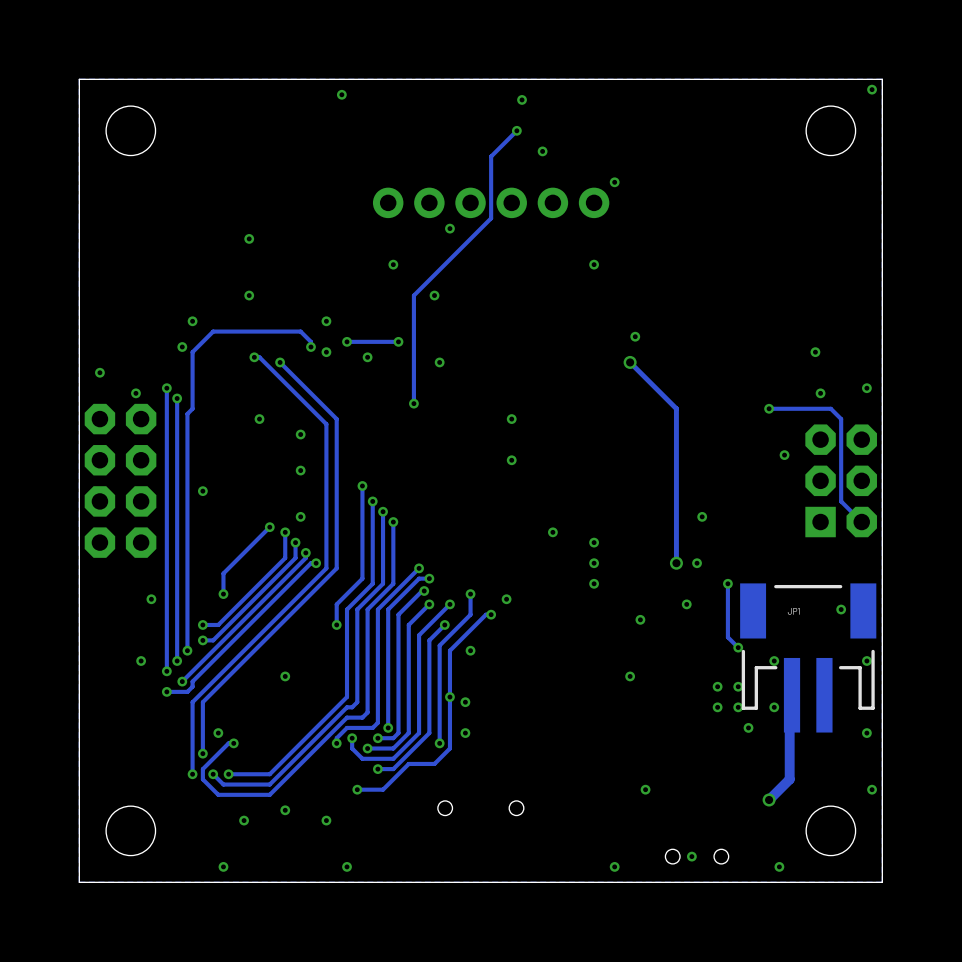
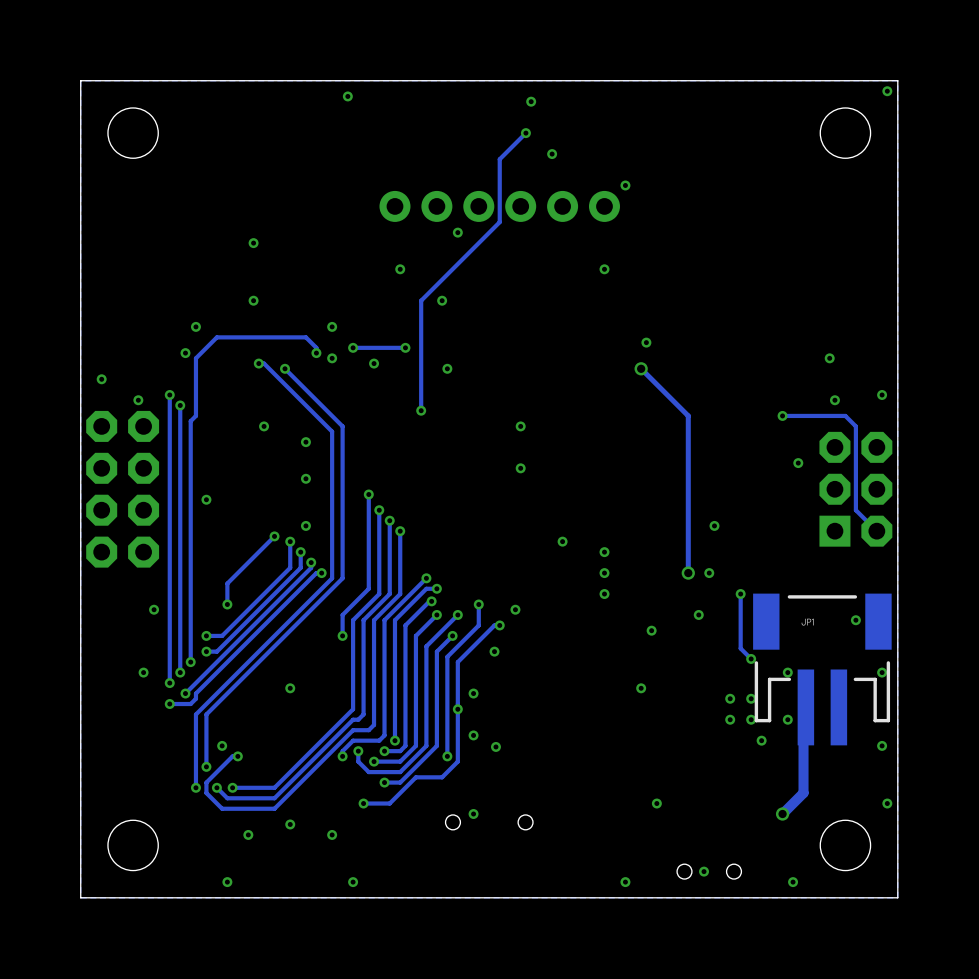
via: none -> (494, 651)
via: (470, 650) -> none
via: none -> (473, 693)
via: (465, 702) -> none
via: none -> (473, 735)
via: (465, 733) -> none
via: none -> (495, 746)
via: none -> (473, 814)

